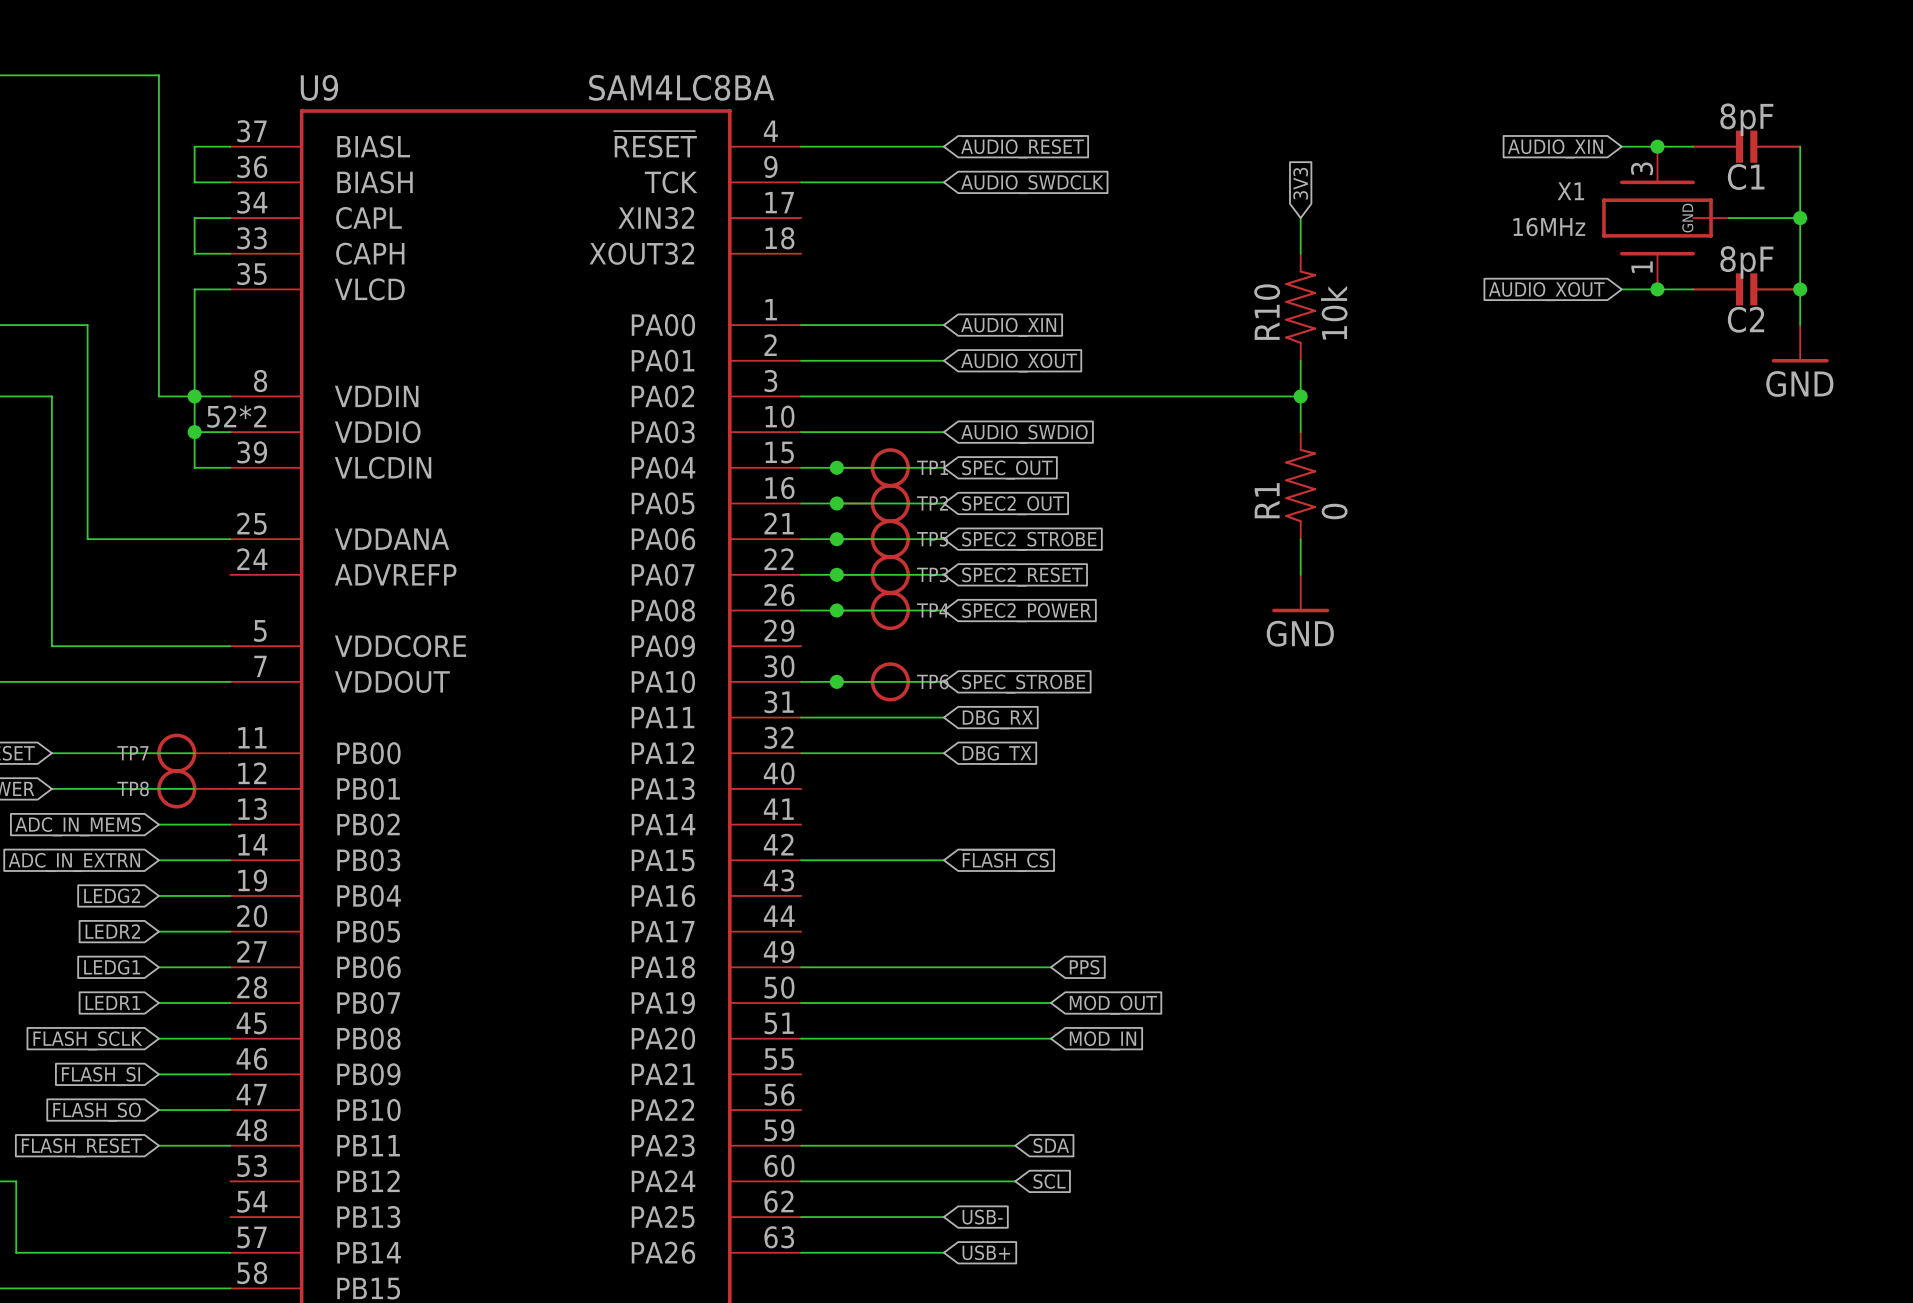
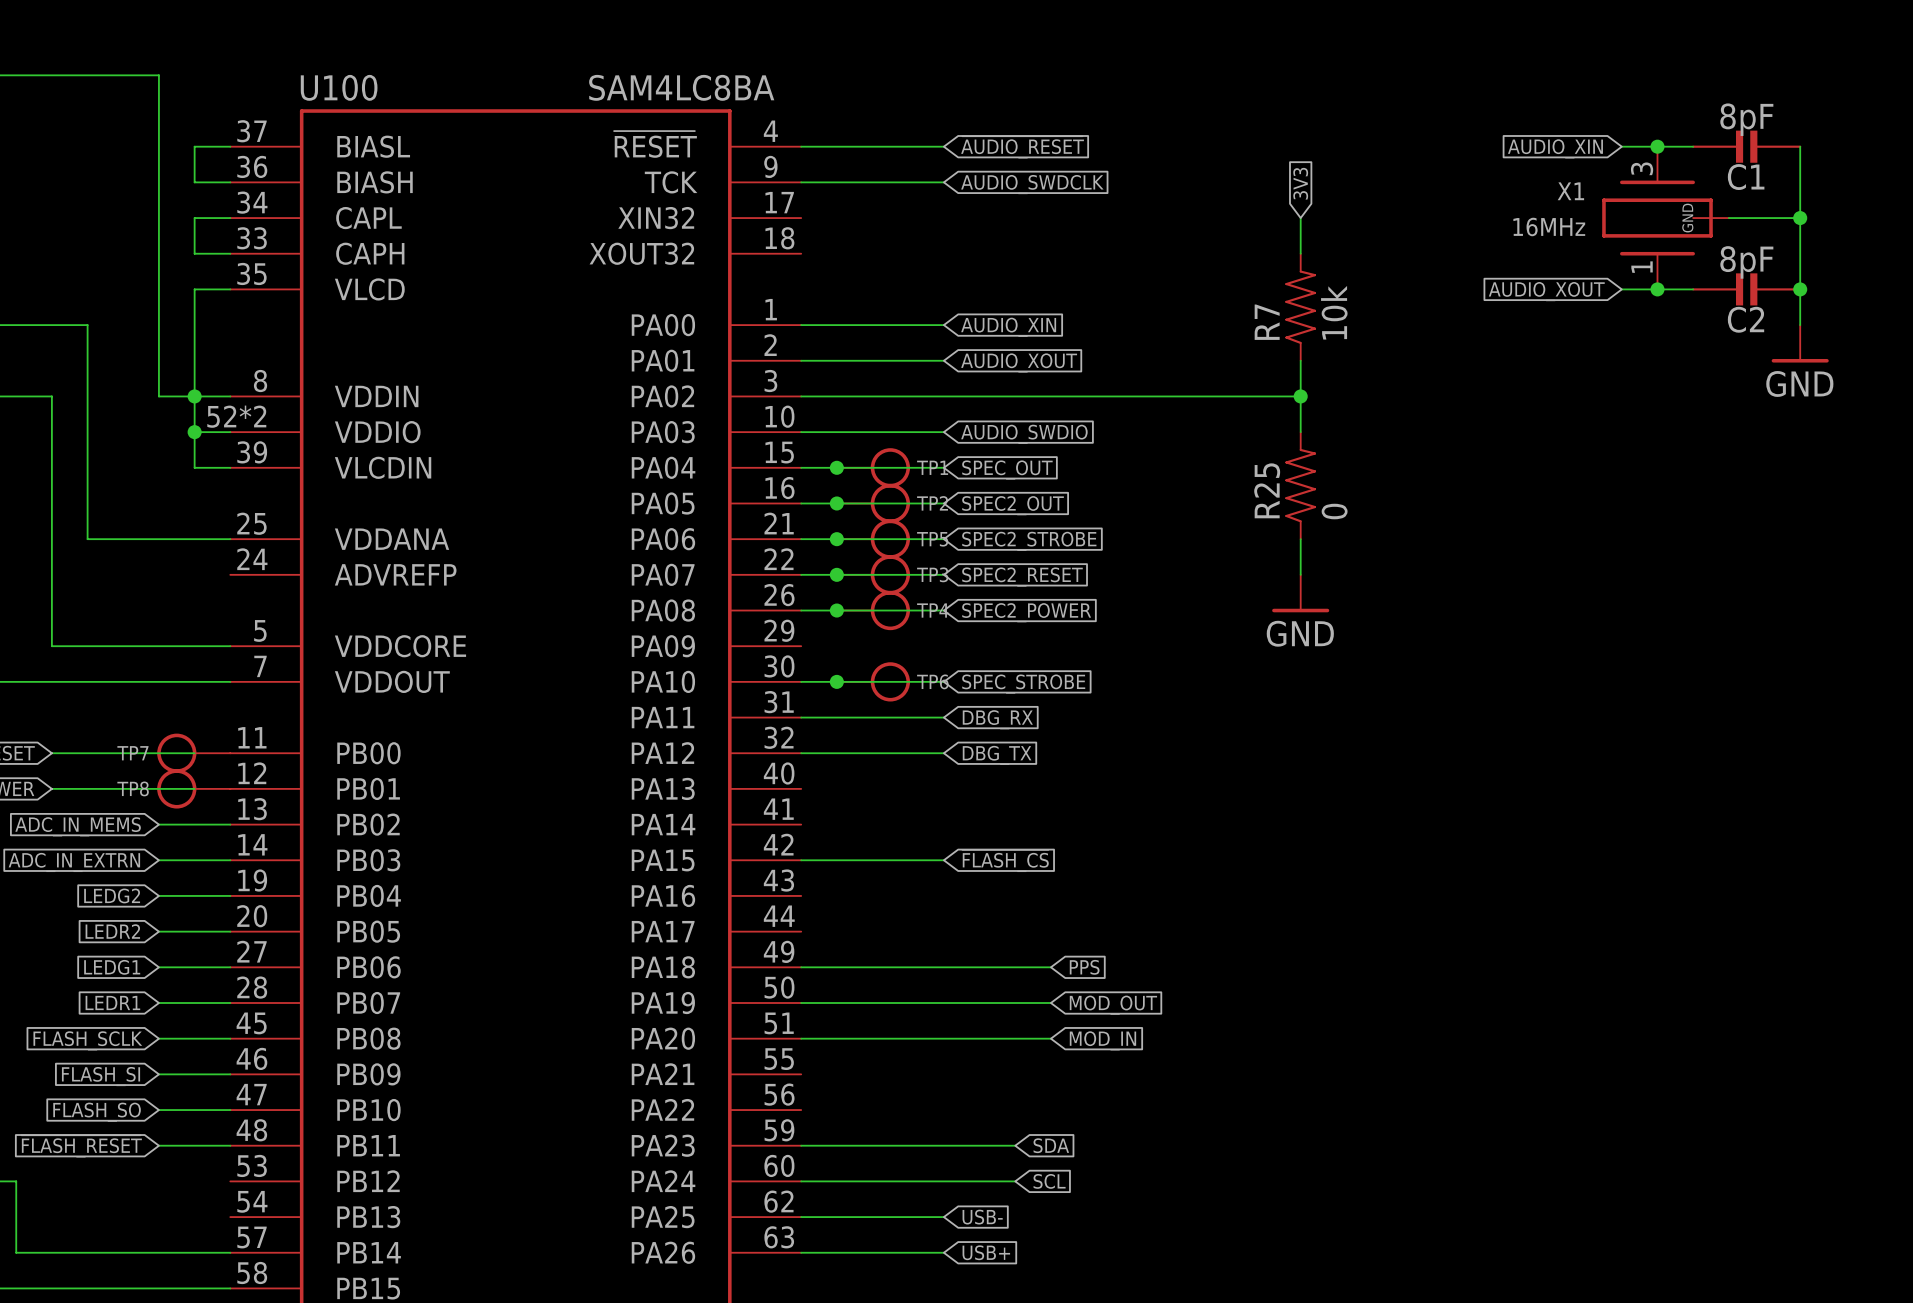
U9 name: U9 (319, 87) -> U100 (339, 87)
R10 name: R10 (1267, 312) -> R7 (1267, 322)
R1 name: R1 (1267, 500) -> R25 (1267, 490)

